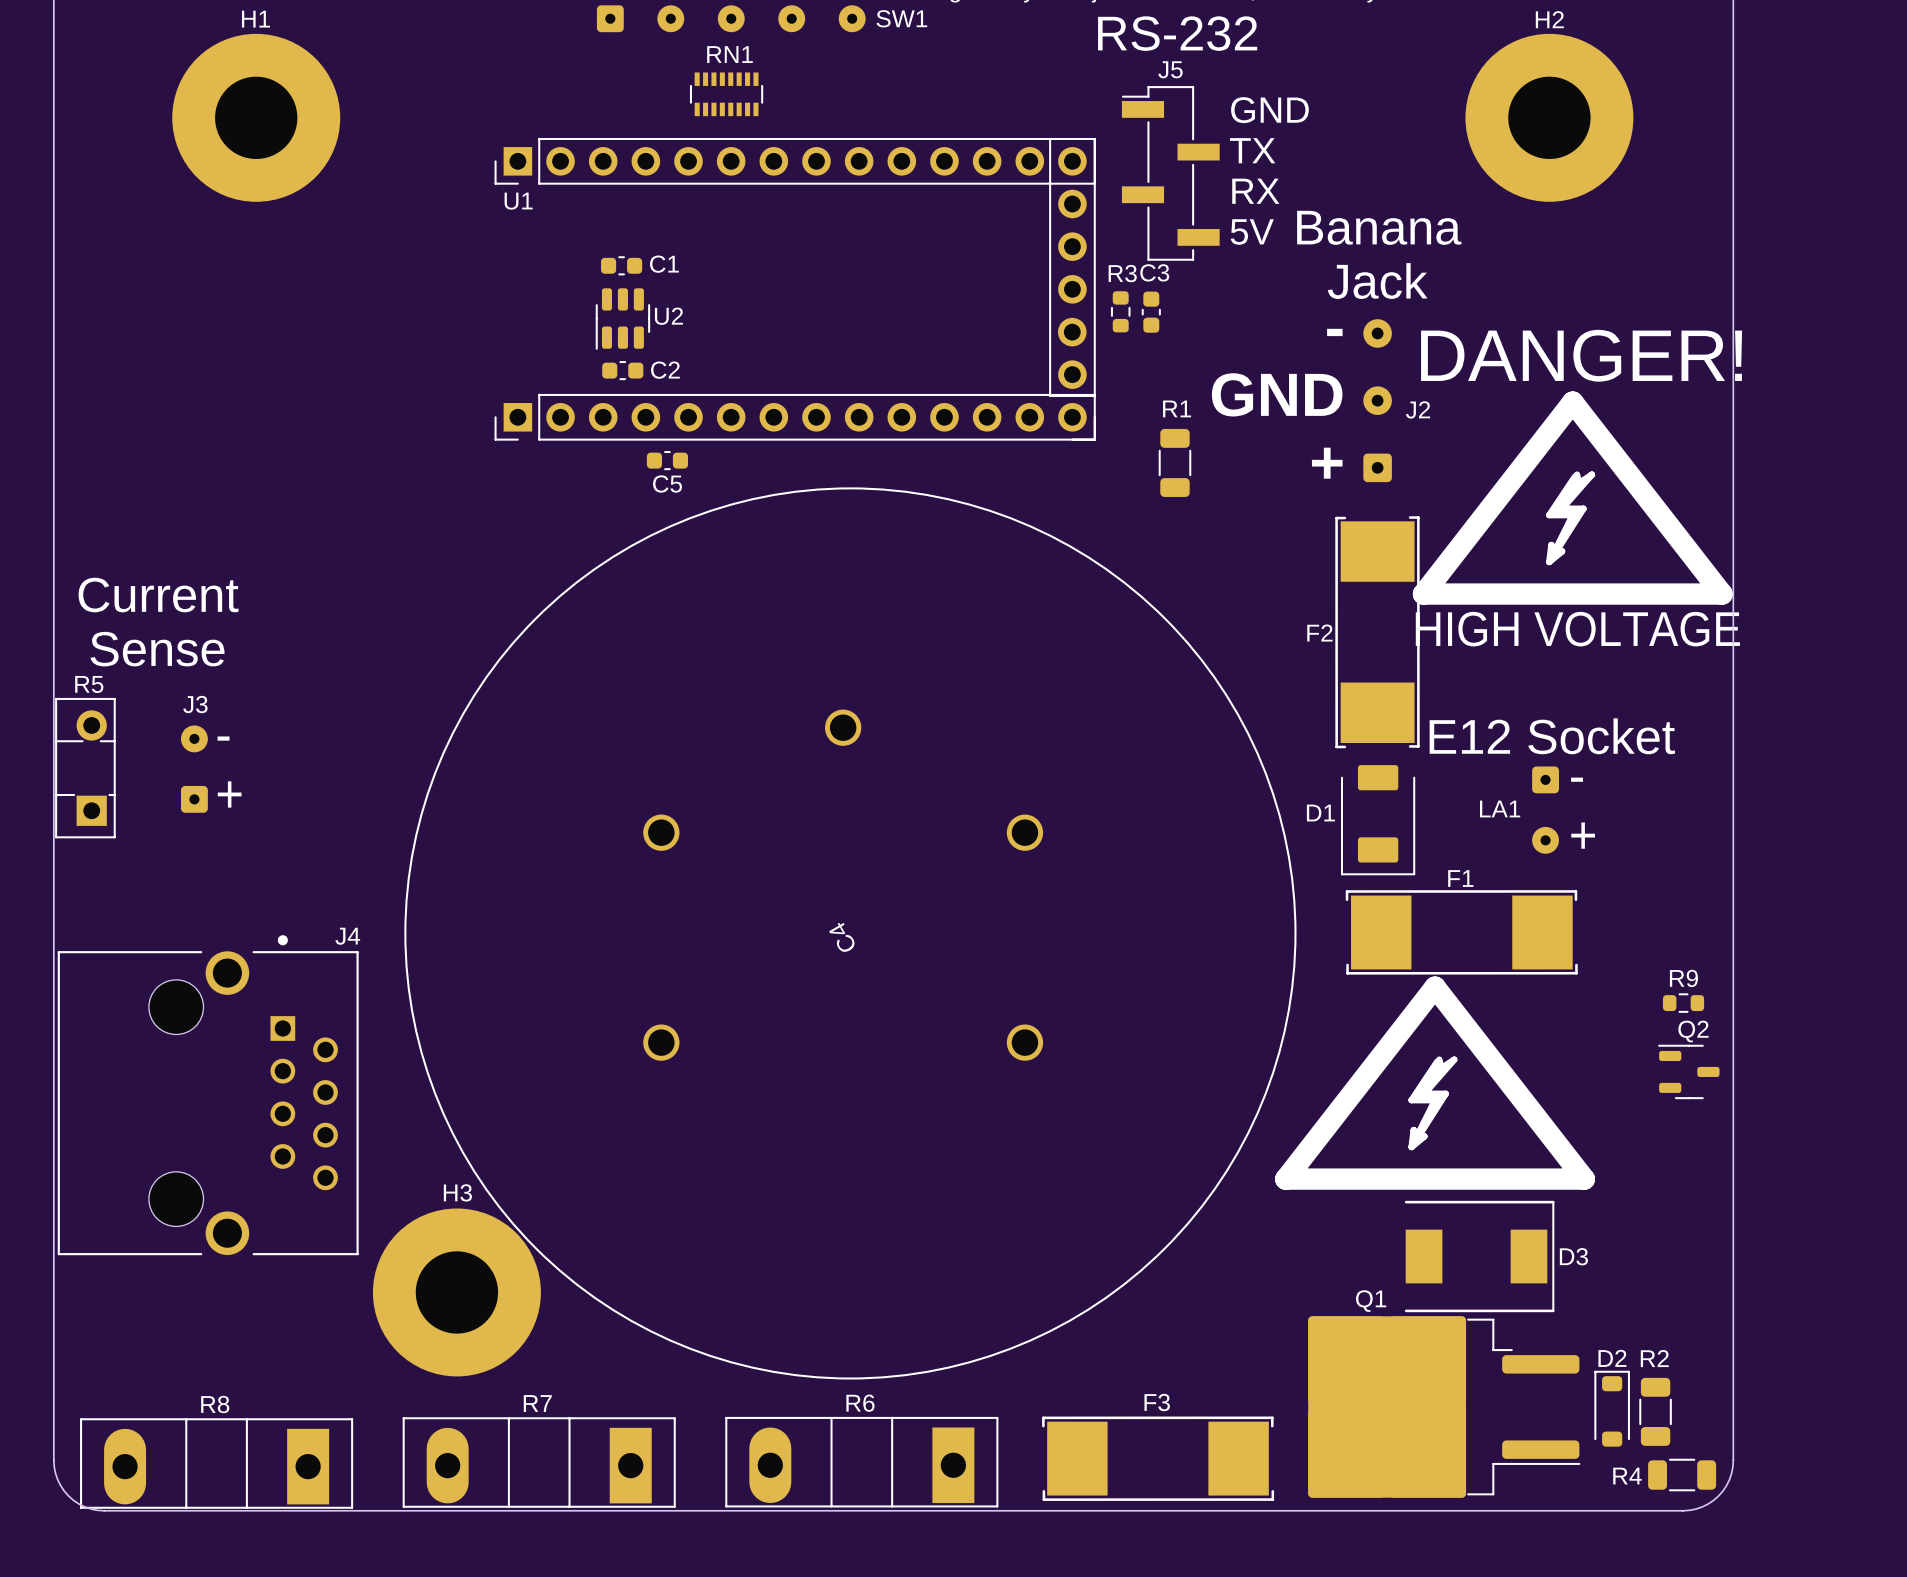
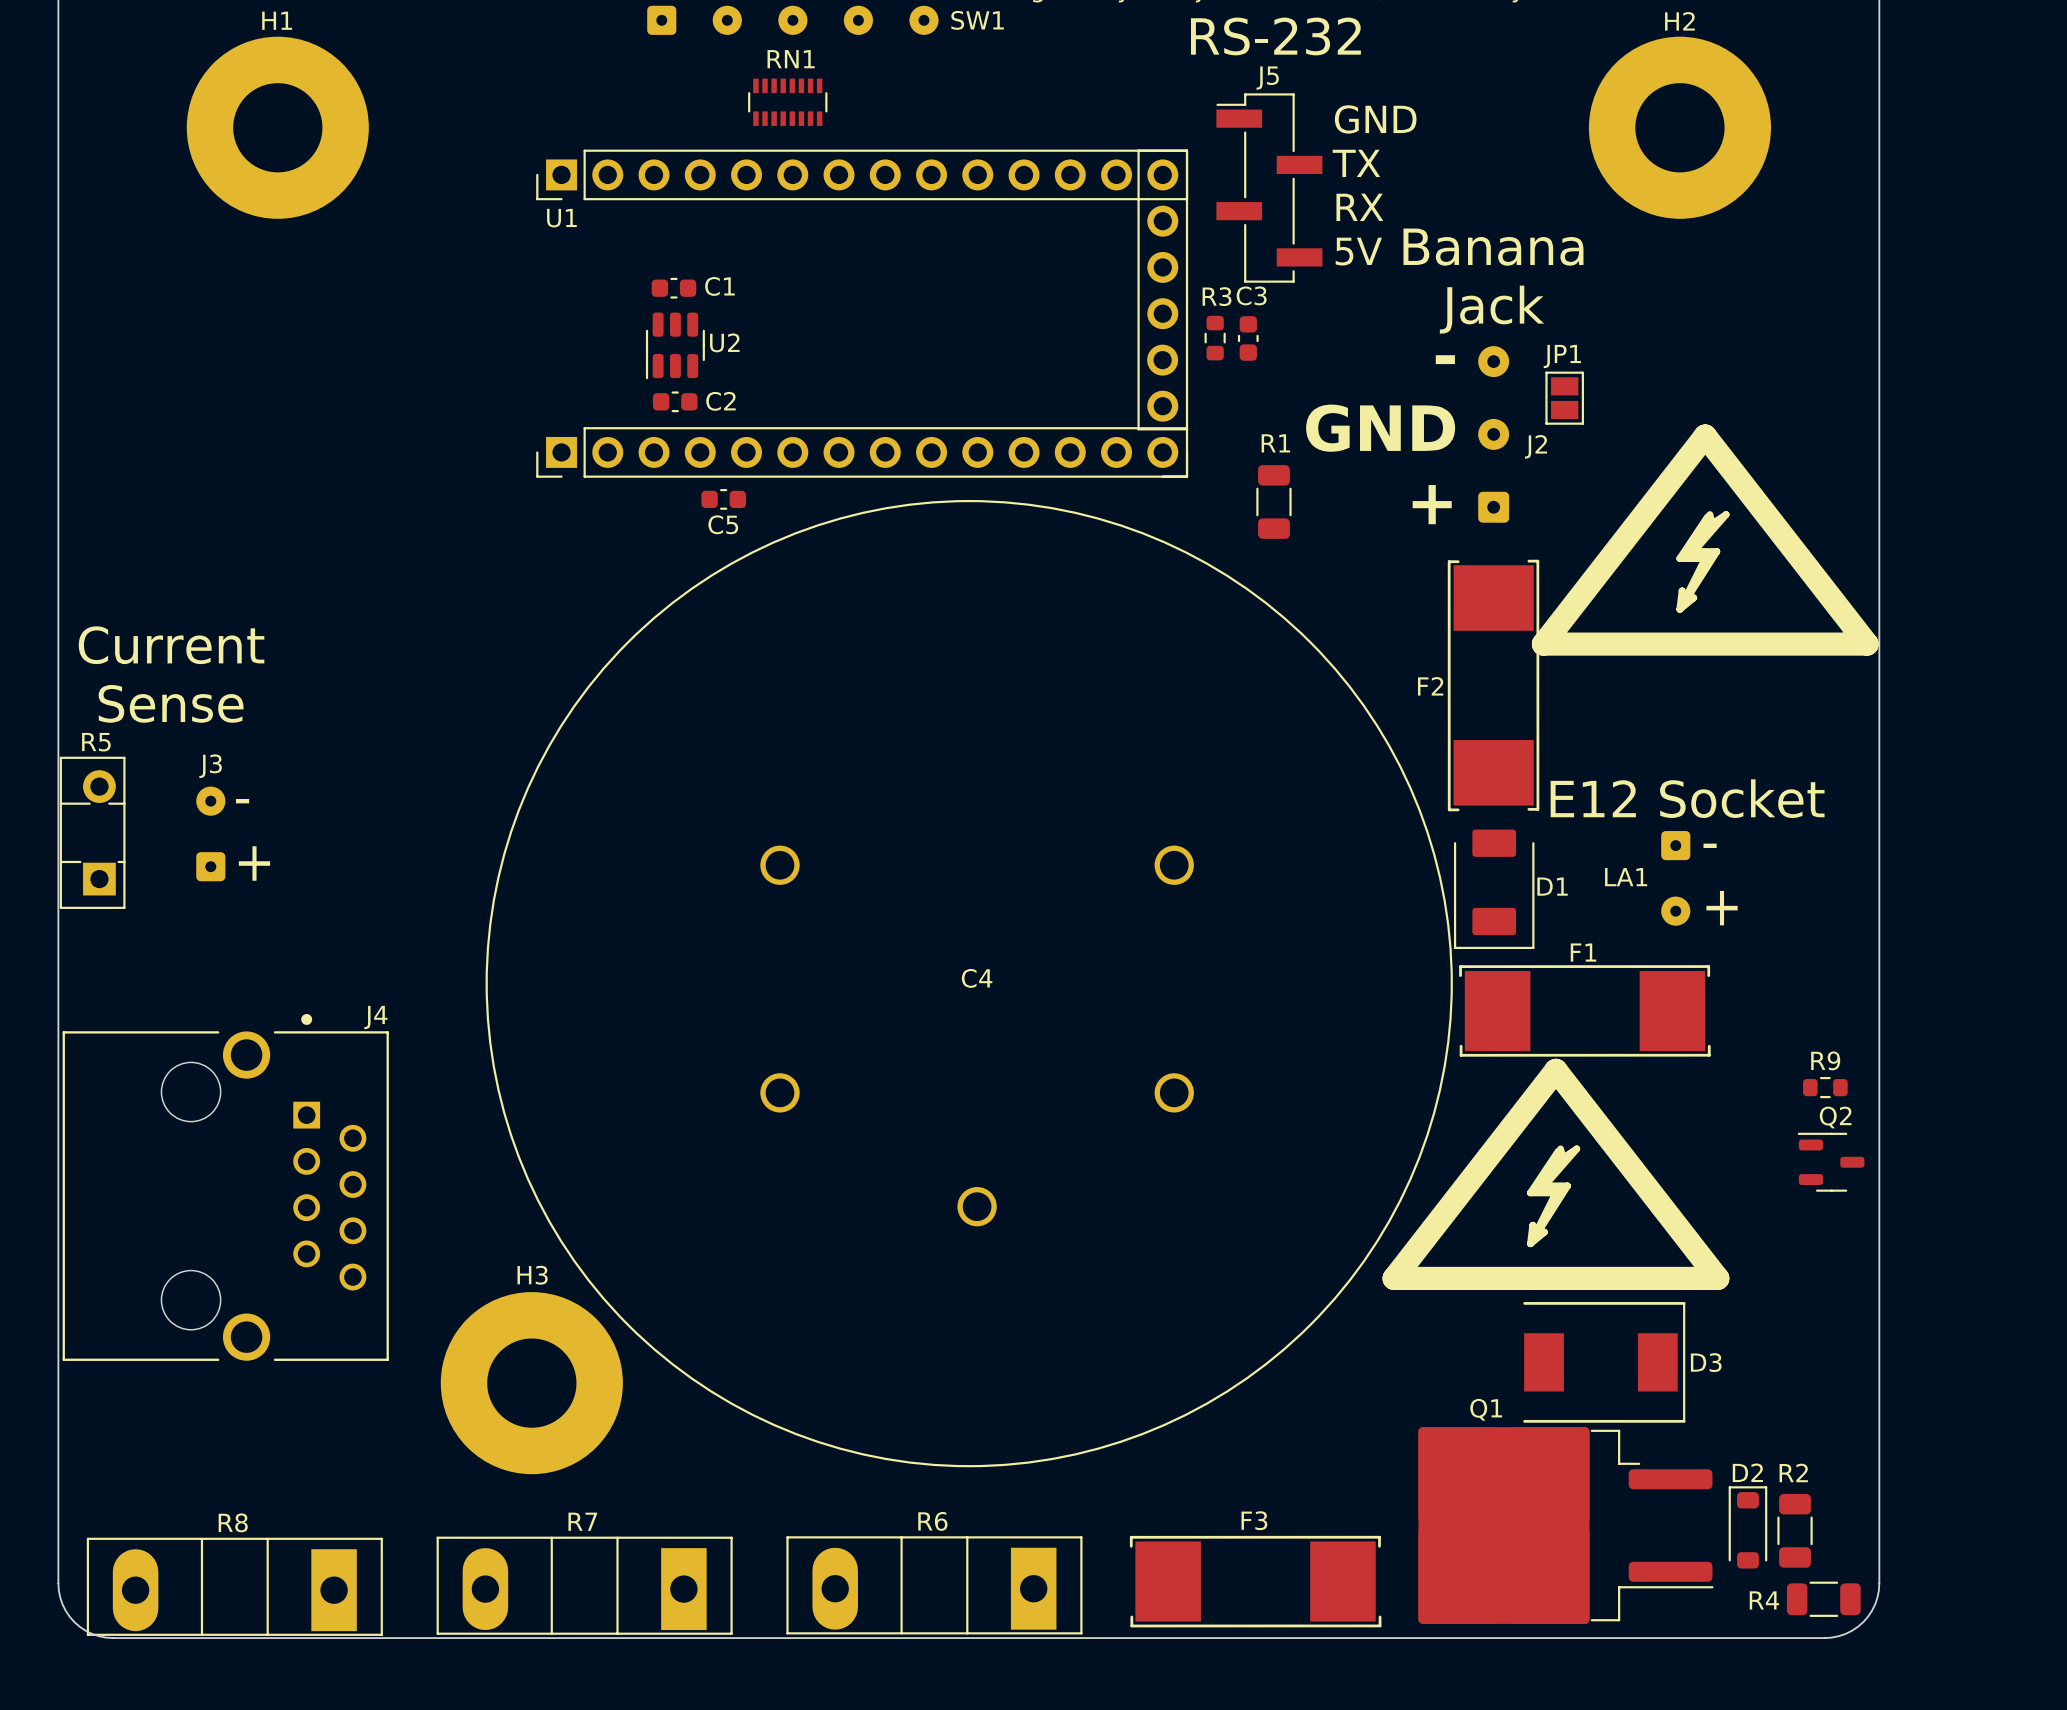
text: DANGER! (1581, 355) -> none
JP1: none -> (1564, 398)
text: HIGH VOLTAGE (1577, 629) -> none
D1 name position: D1 (1320, 813) -> D1 (1552, 886)
C4 rotation: 0° (850, 933) -> 180° (969, 983)
H3 position: (456, 1292) -> (531, 1383)

